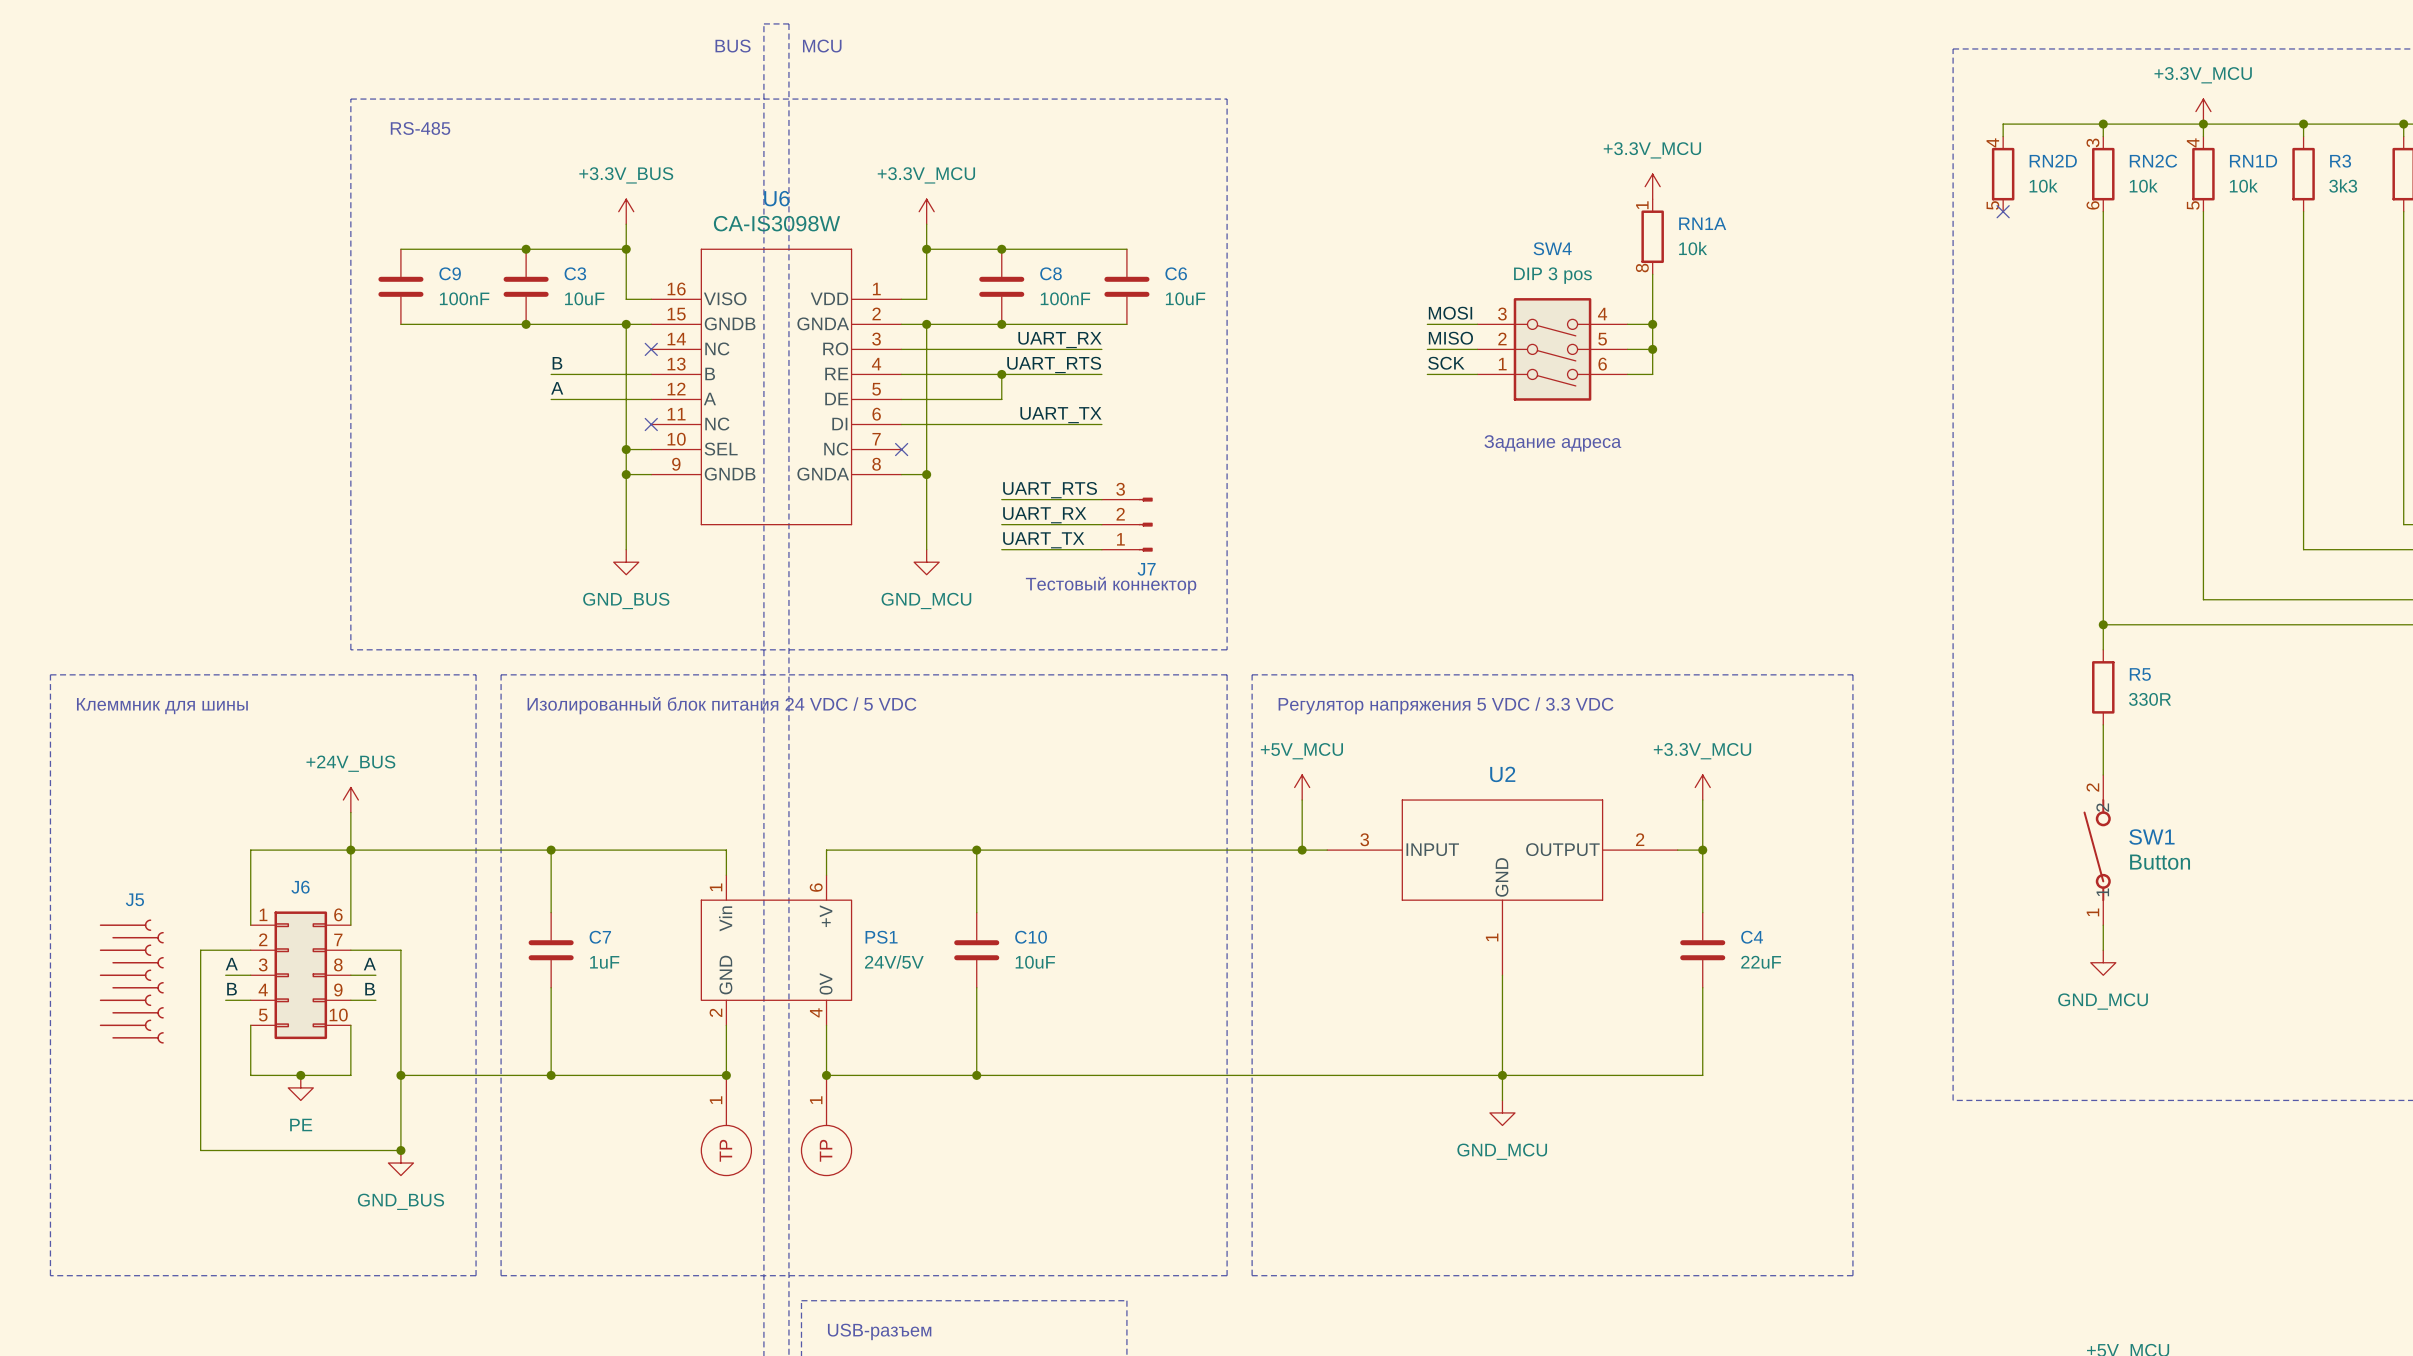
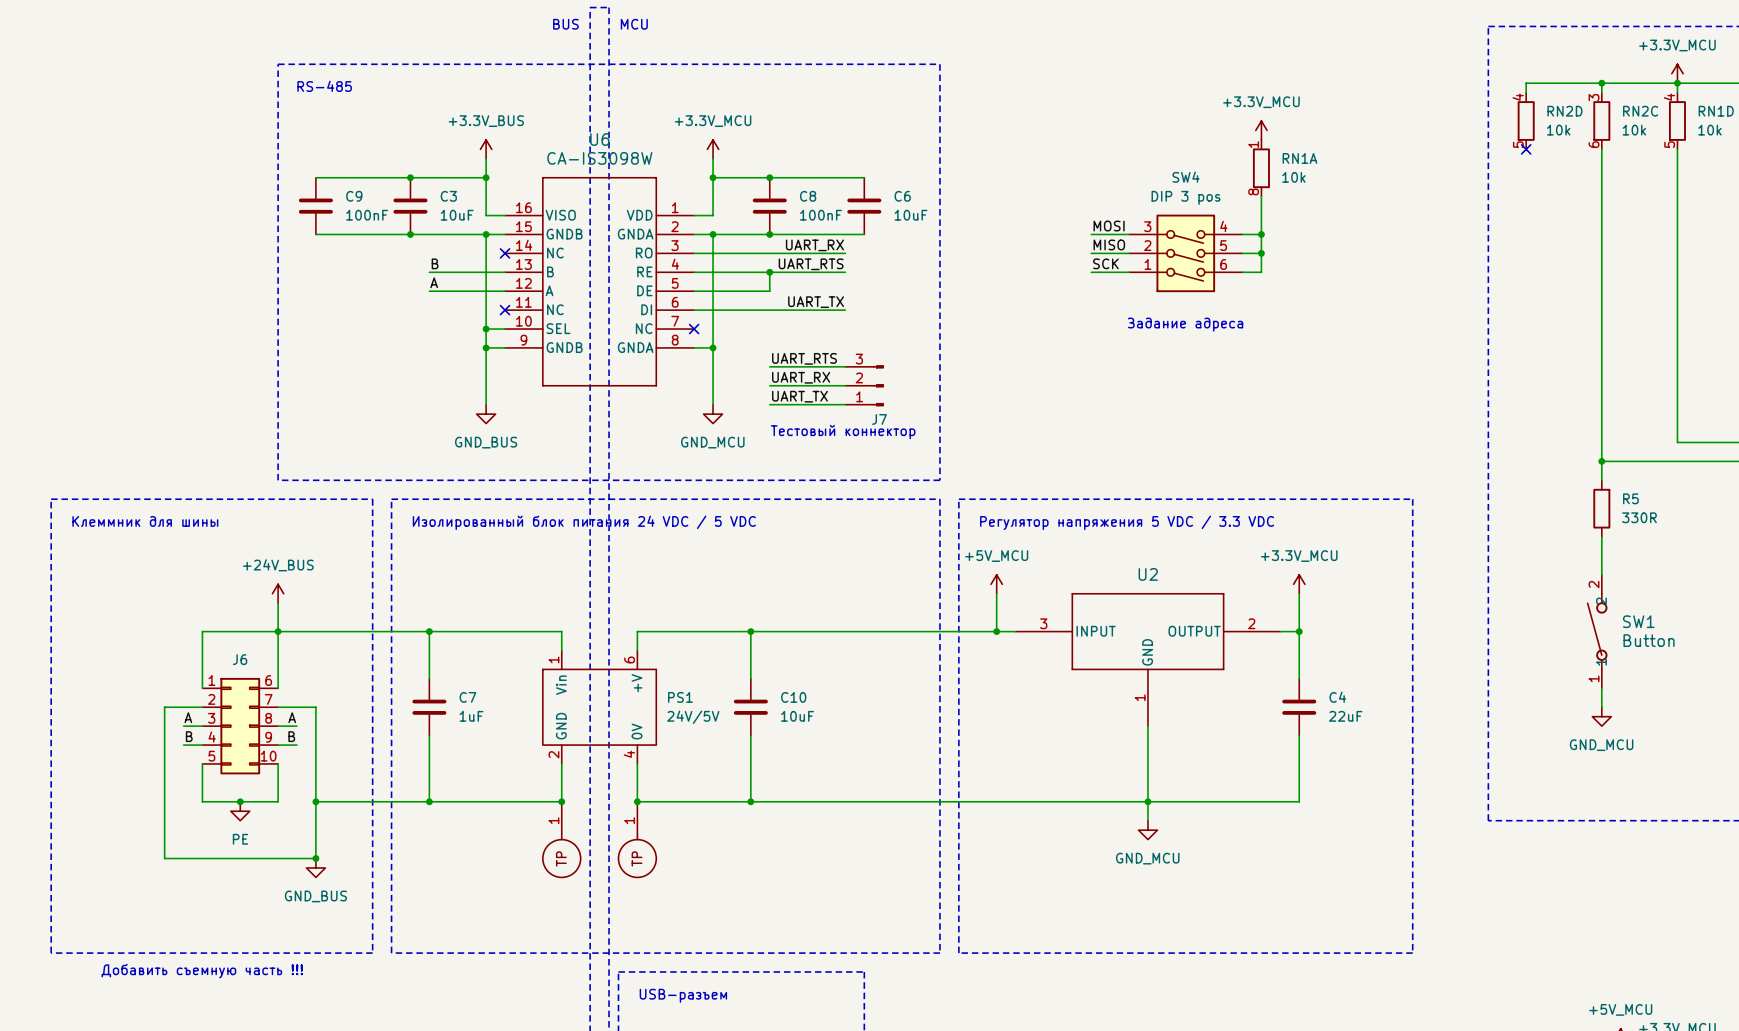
J5: (131, 981) -> none
text: none -> Добавить съемную часть !!! (202, 971)

